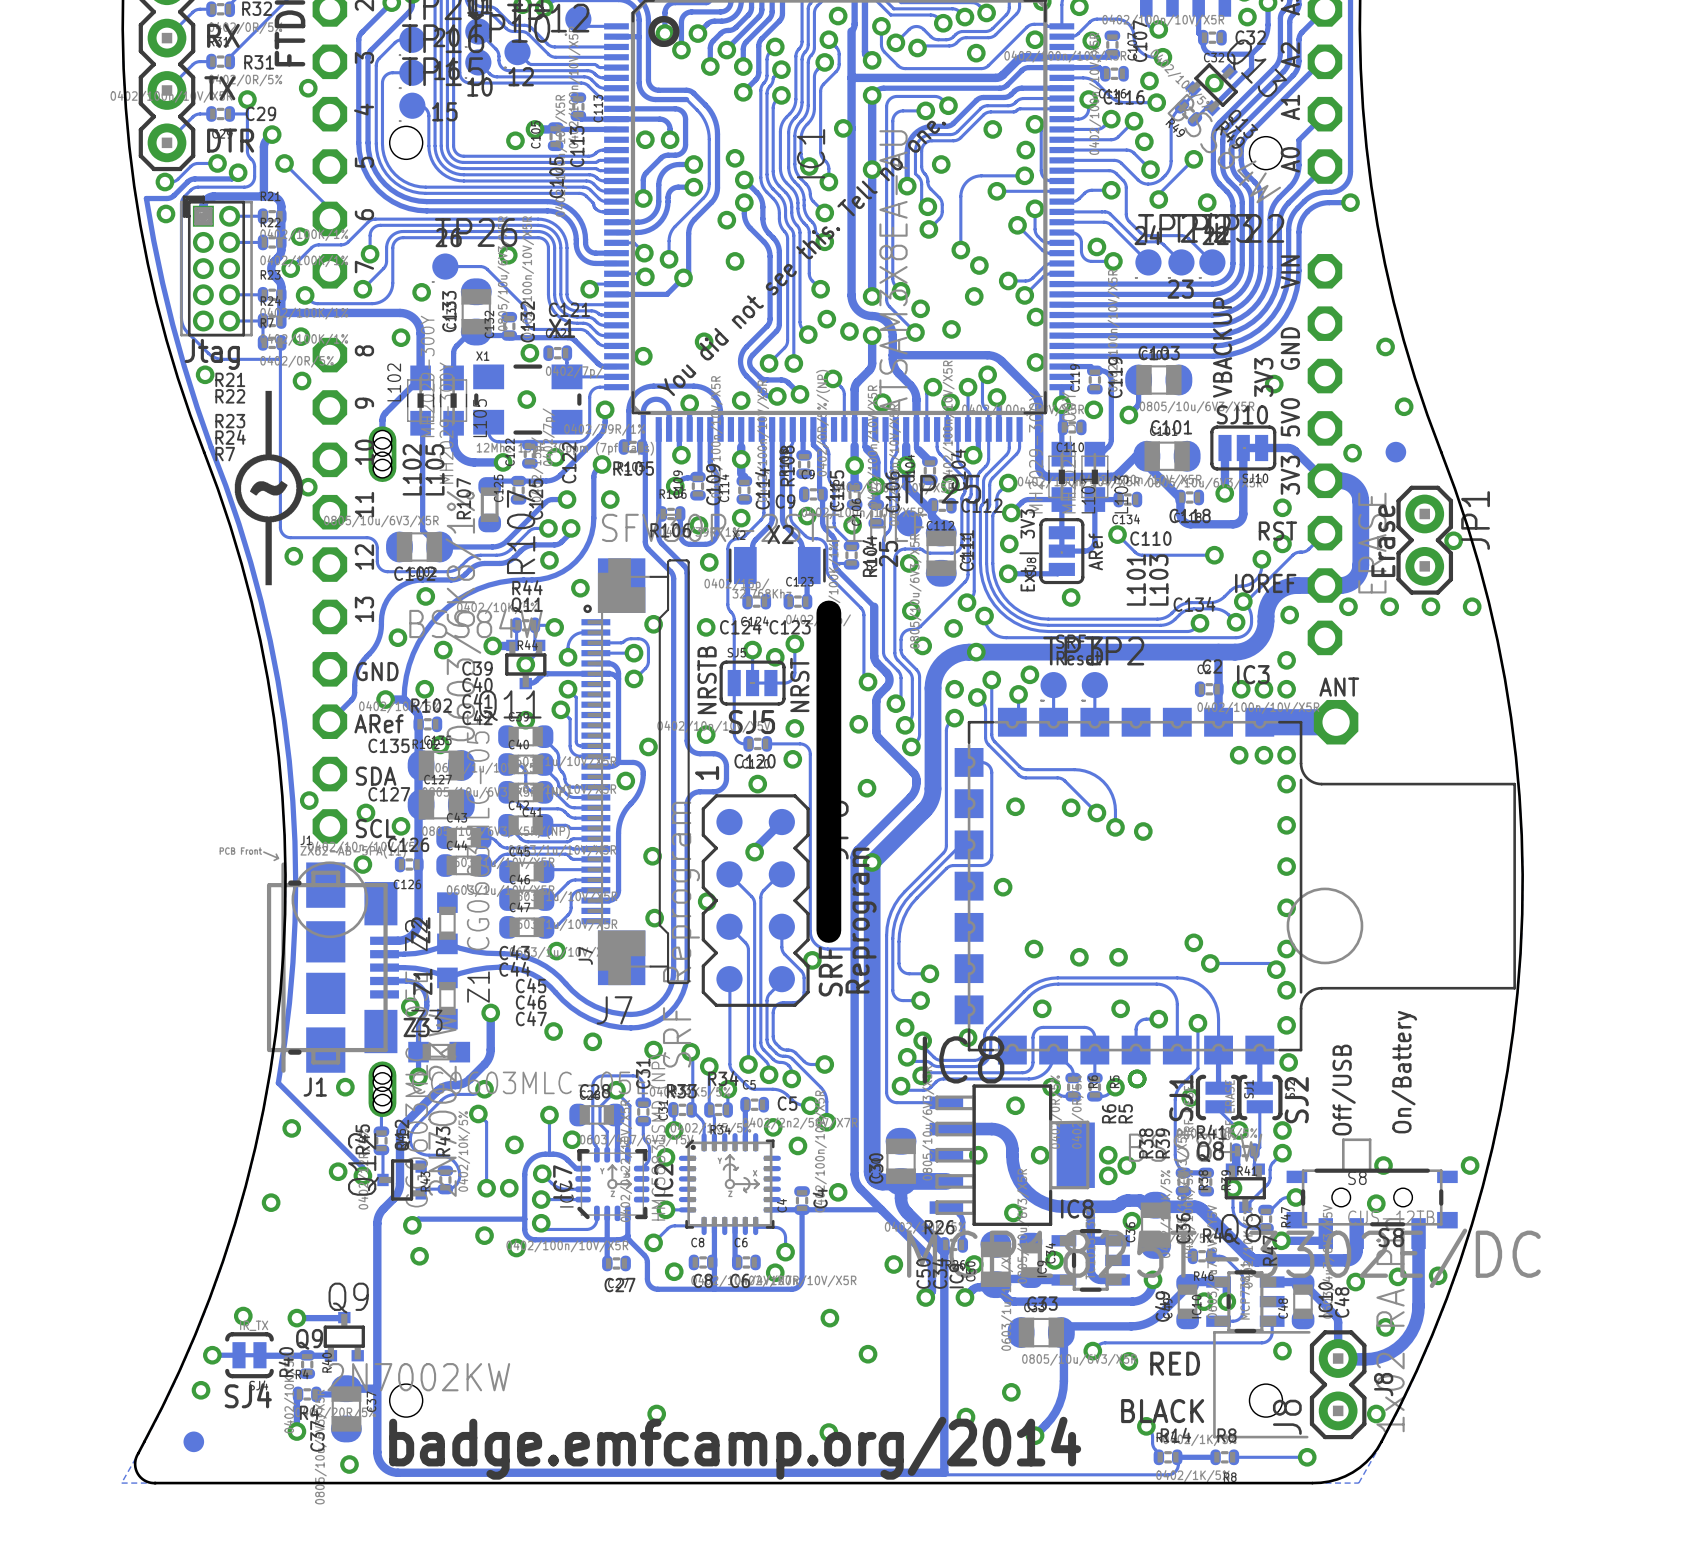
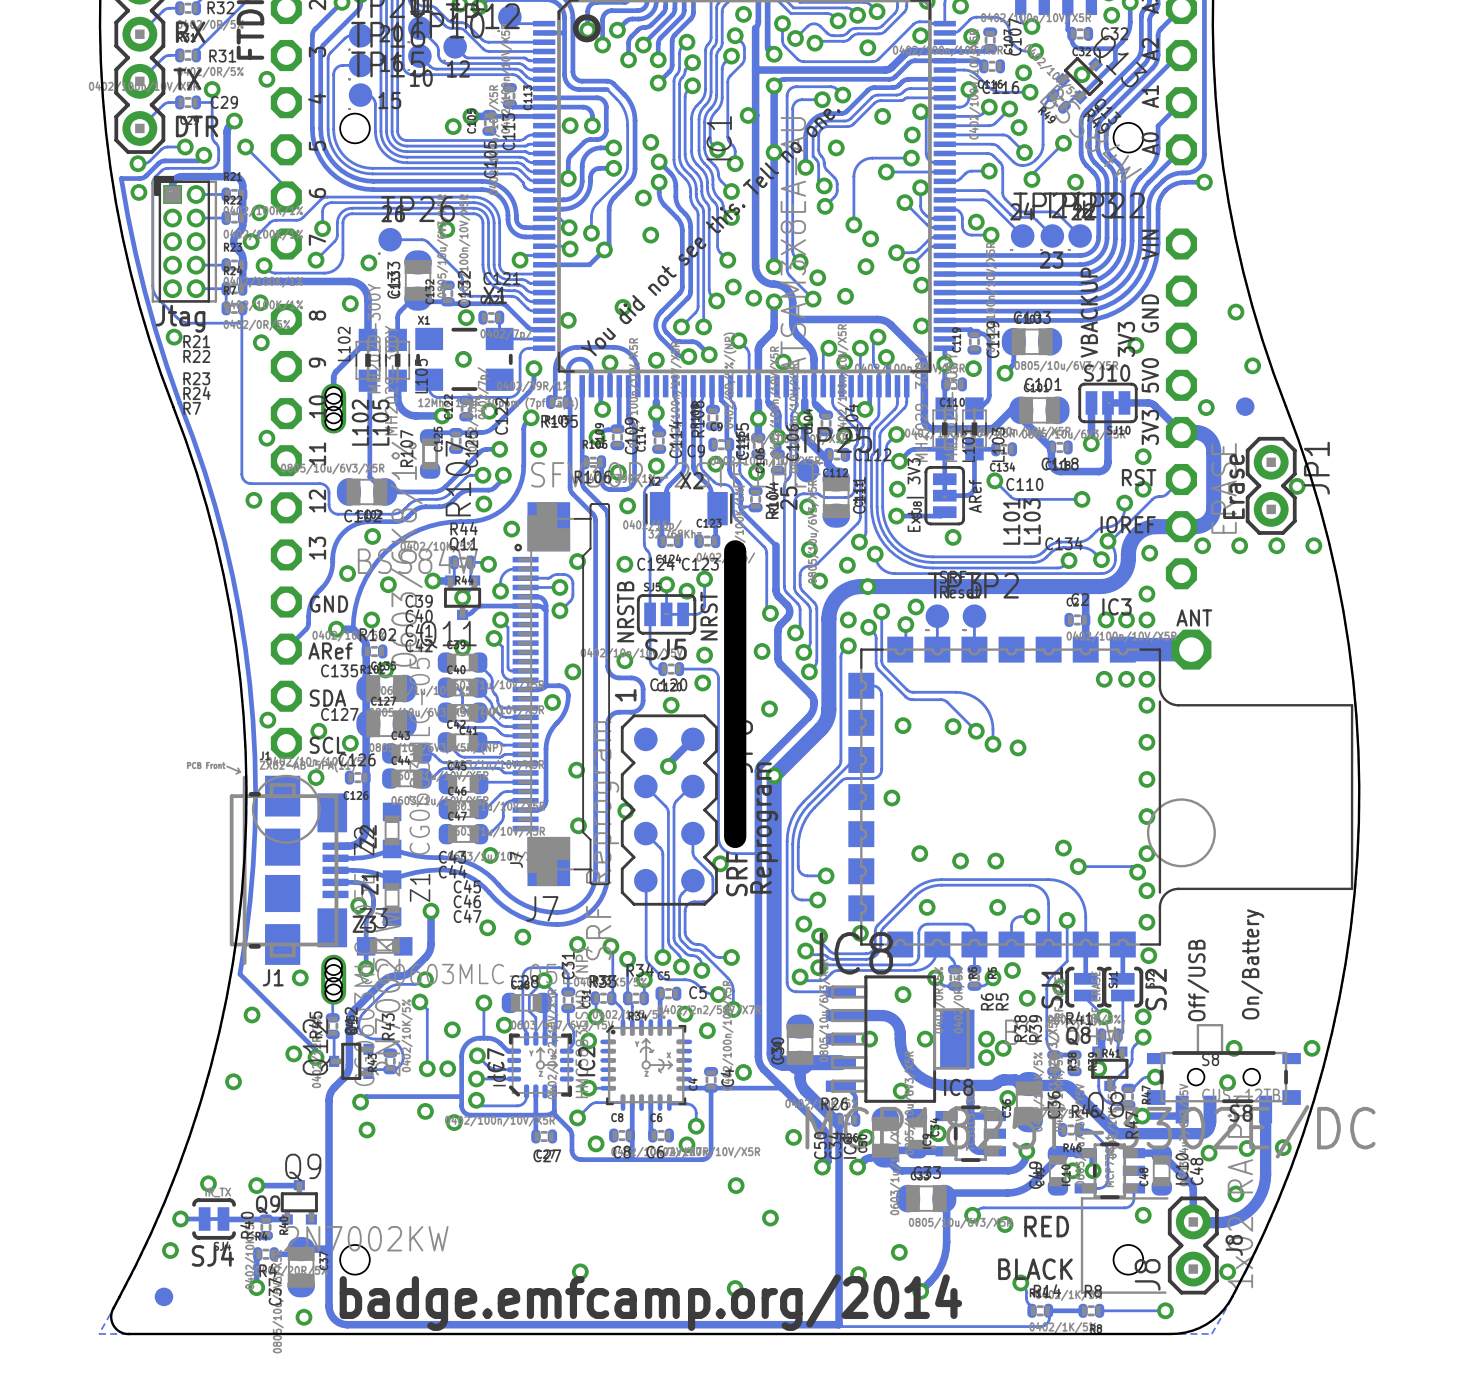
drawing: [234, 390, 303, 586] -> none
via: none -> (1027, 998)

